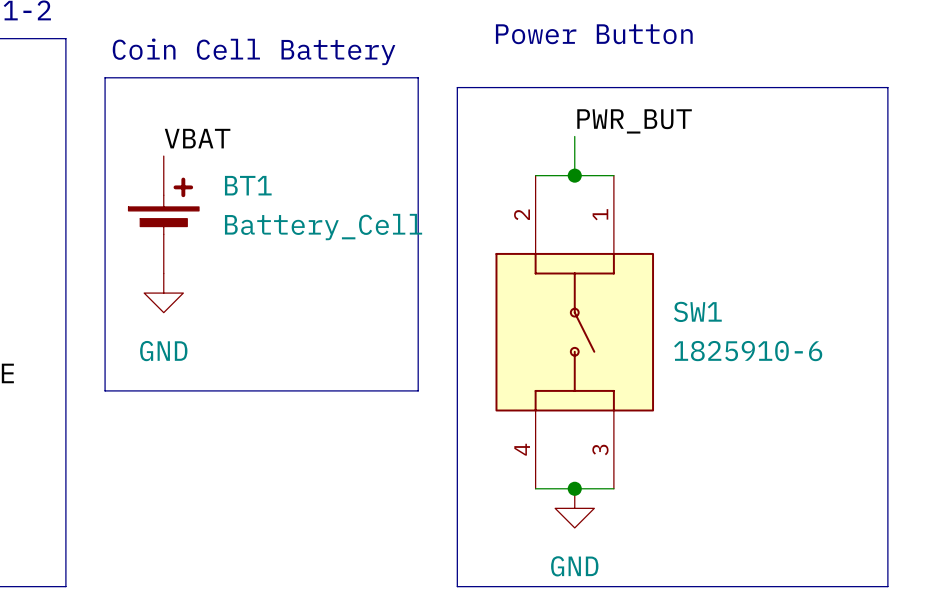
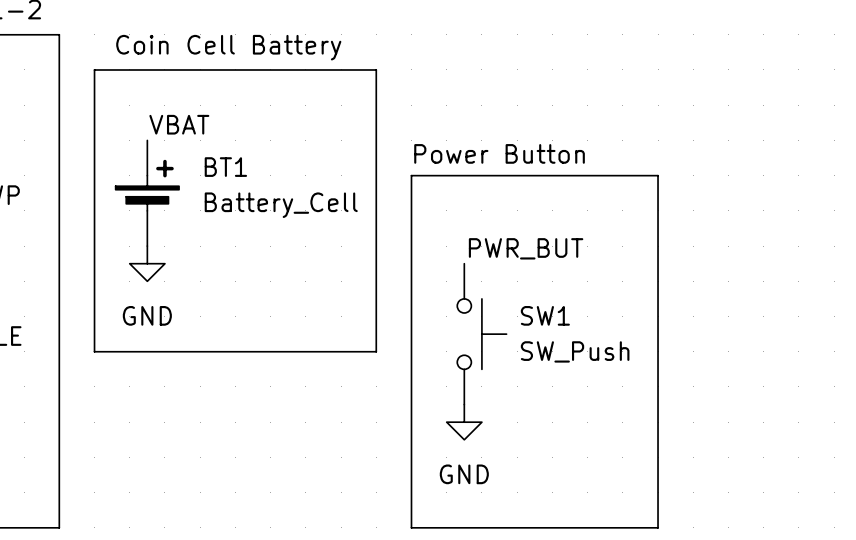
text position: Power Button (594, 34) -> Power Button (499, 153)
label position: PWR_BUT (634, 121) -> PWR_BUT (526, 248)
wire: (574, 136) (574, 175) -> none
SW1 symbol: [495, 175, 655, 489] -> [457, 263, 507, 405]
wire: (535, 175) (613, 175) -> none
junction: (574, 175) -> none
line: (457, 195) (457, 87) (887, 87) (887, 586) (731, 586) -> (411, 175) (658, 175) (658, 527)
SW1 name position: SW1 (697, 311) -> SW1 (545, 315)
SW1 value: 1825910-6 (748, 351) -> SW_Push (575, 351)
wire: (535, 488) (613, 488) -> none
junction: (574, 488) -> none
power symbol position: GND (574, 508) -> GND (464, 422)

